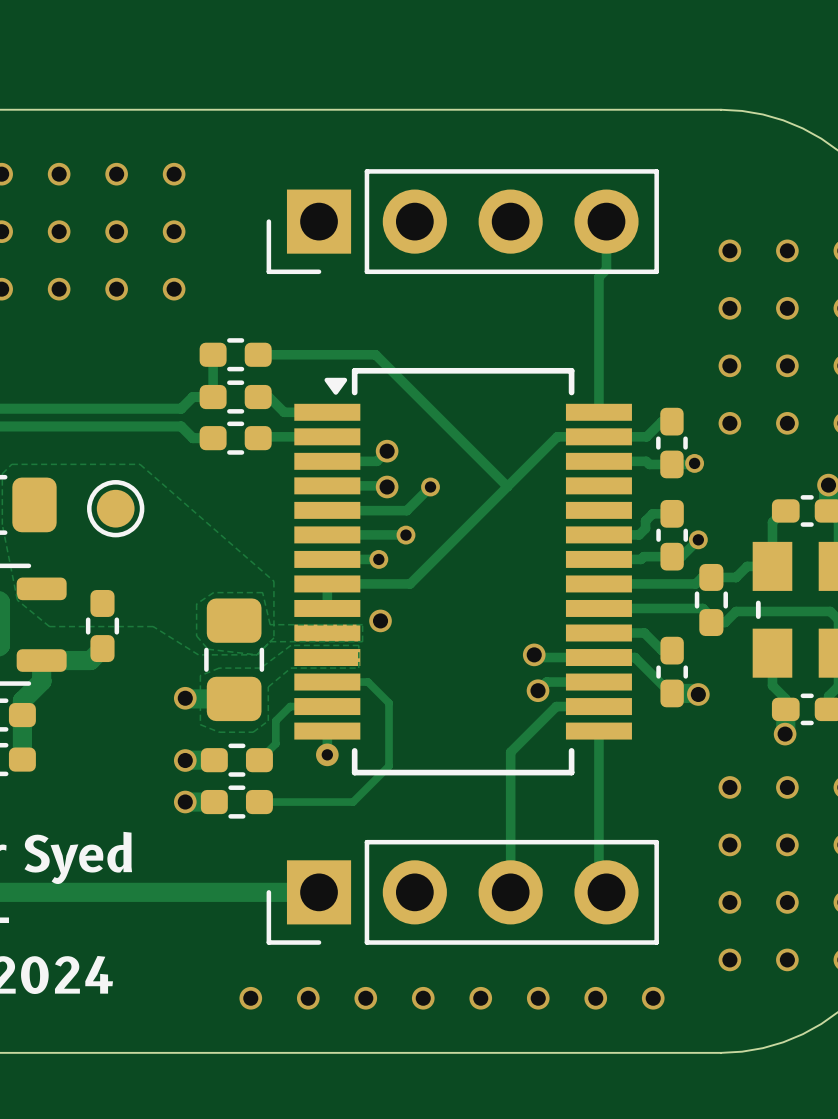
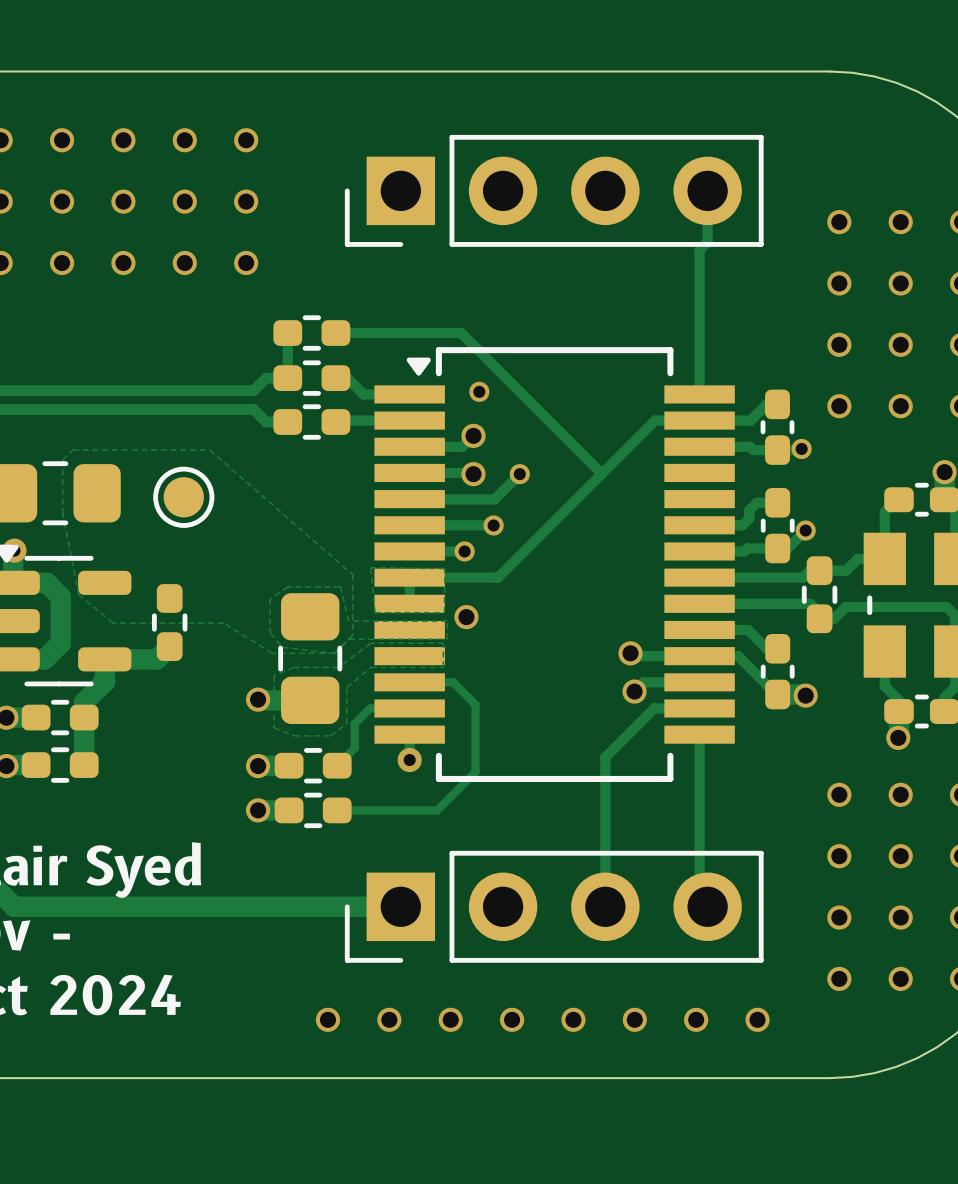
via: none -> (479, 391)
zone outline: none -> (370, 567) (444, 568) (444, 612) (375, 612) (370, 567)

